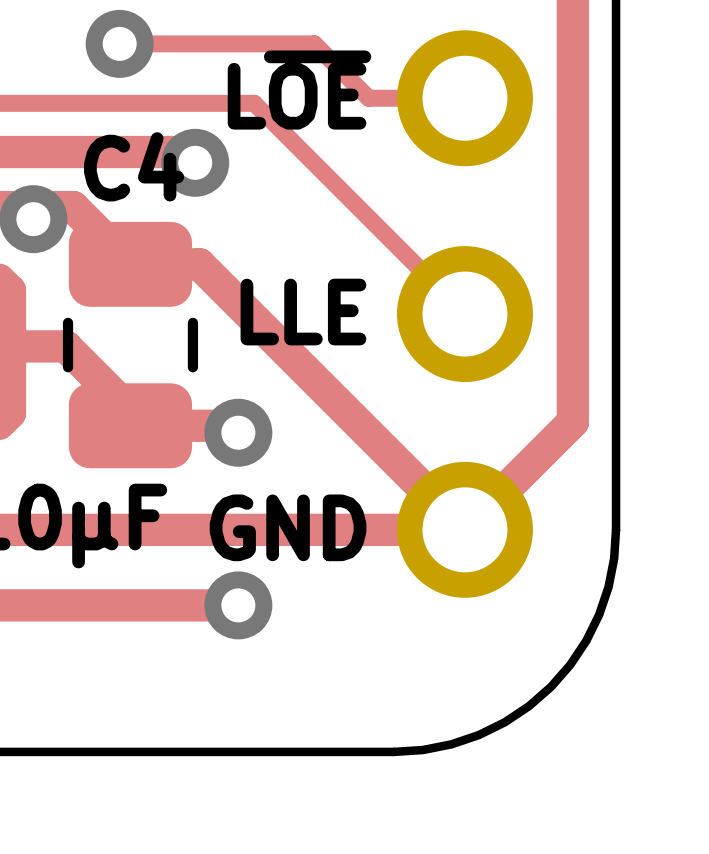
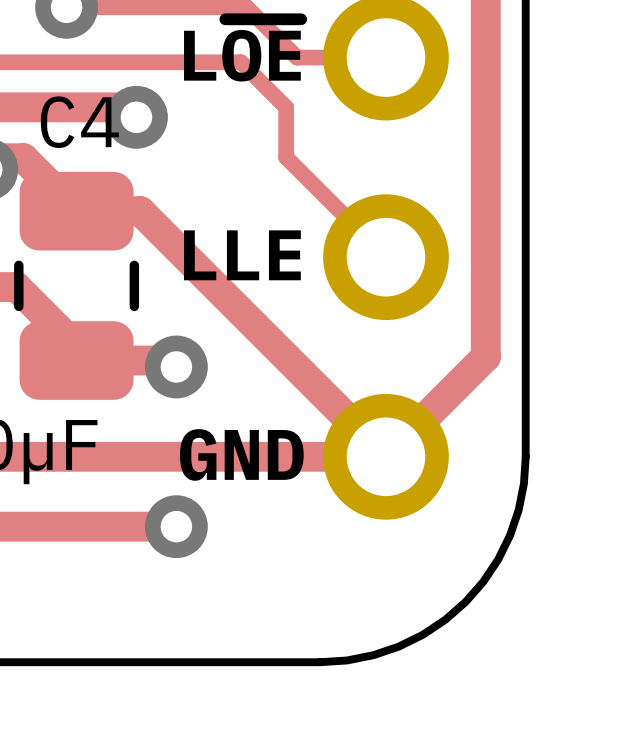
track: (254, 103) (357, 206) -> (191, 62) (240, 62) (286, 107) (286, 157)

